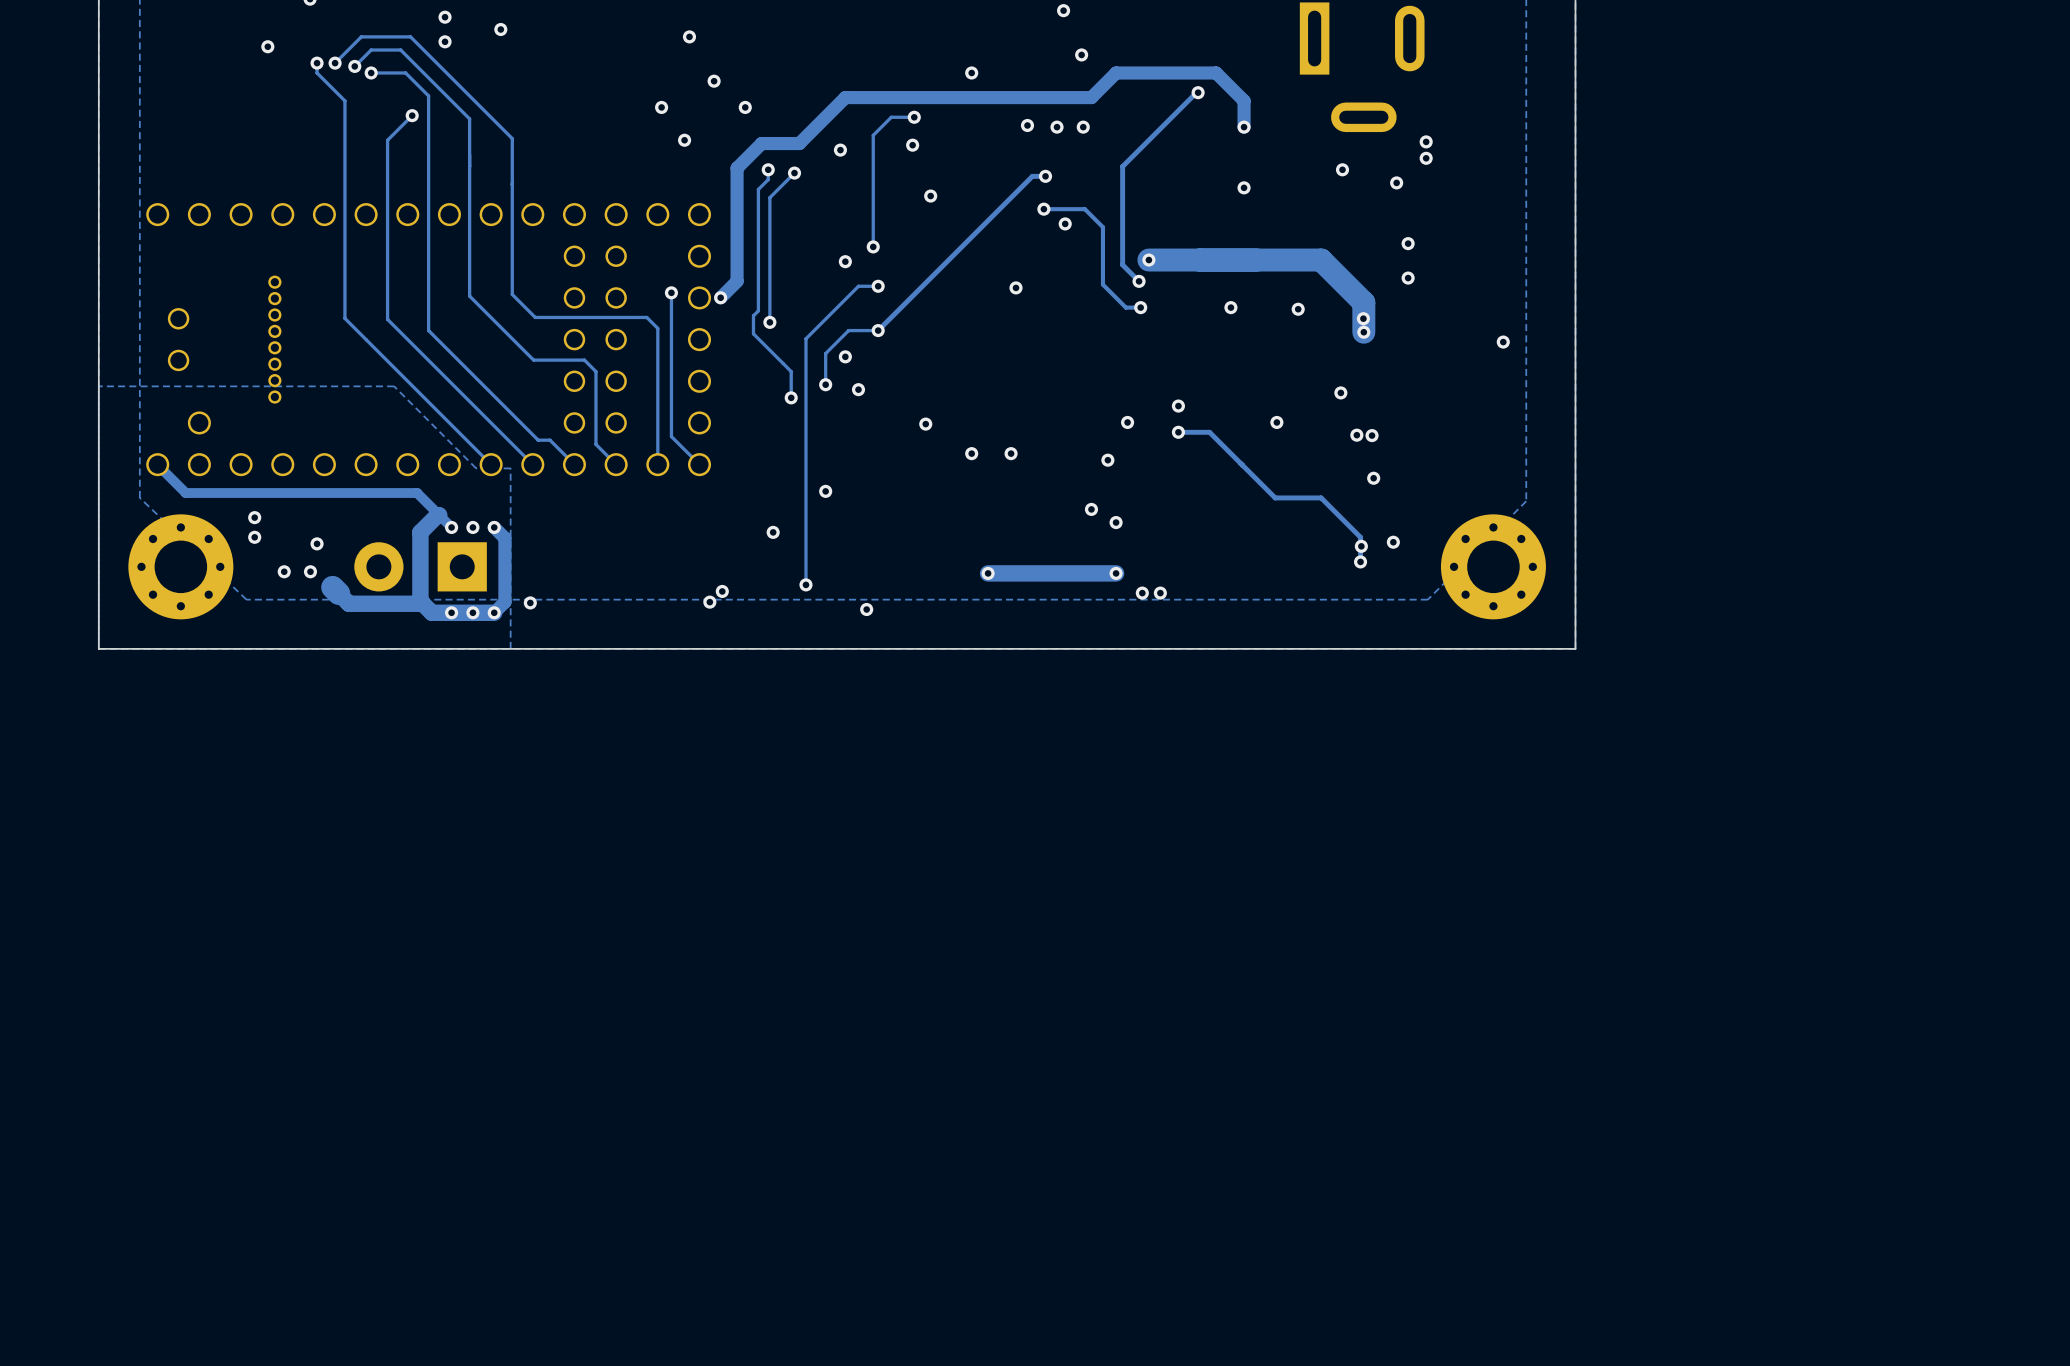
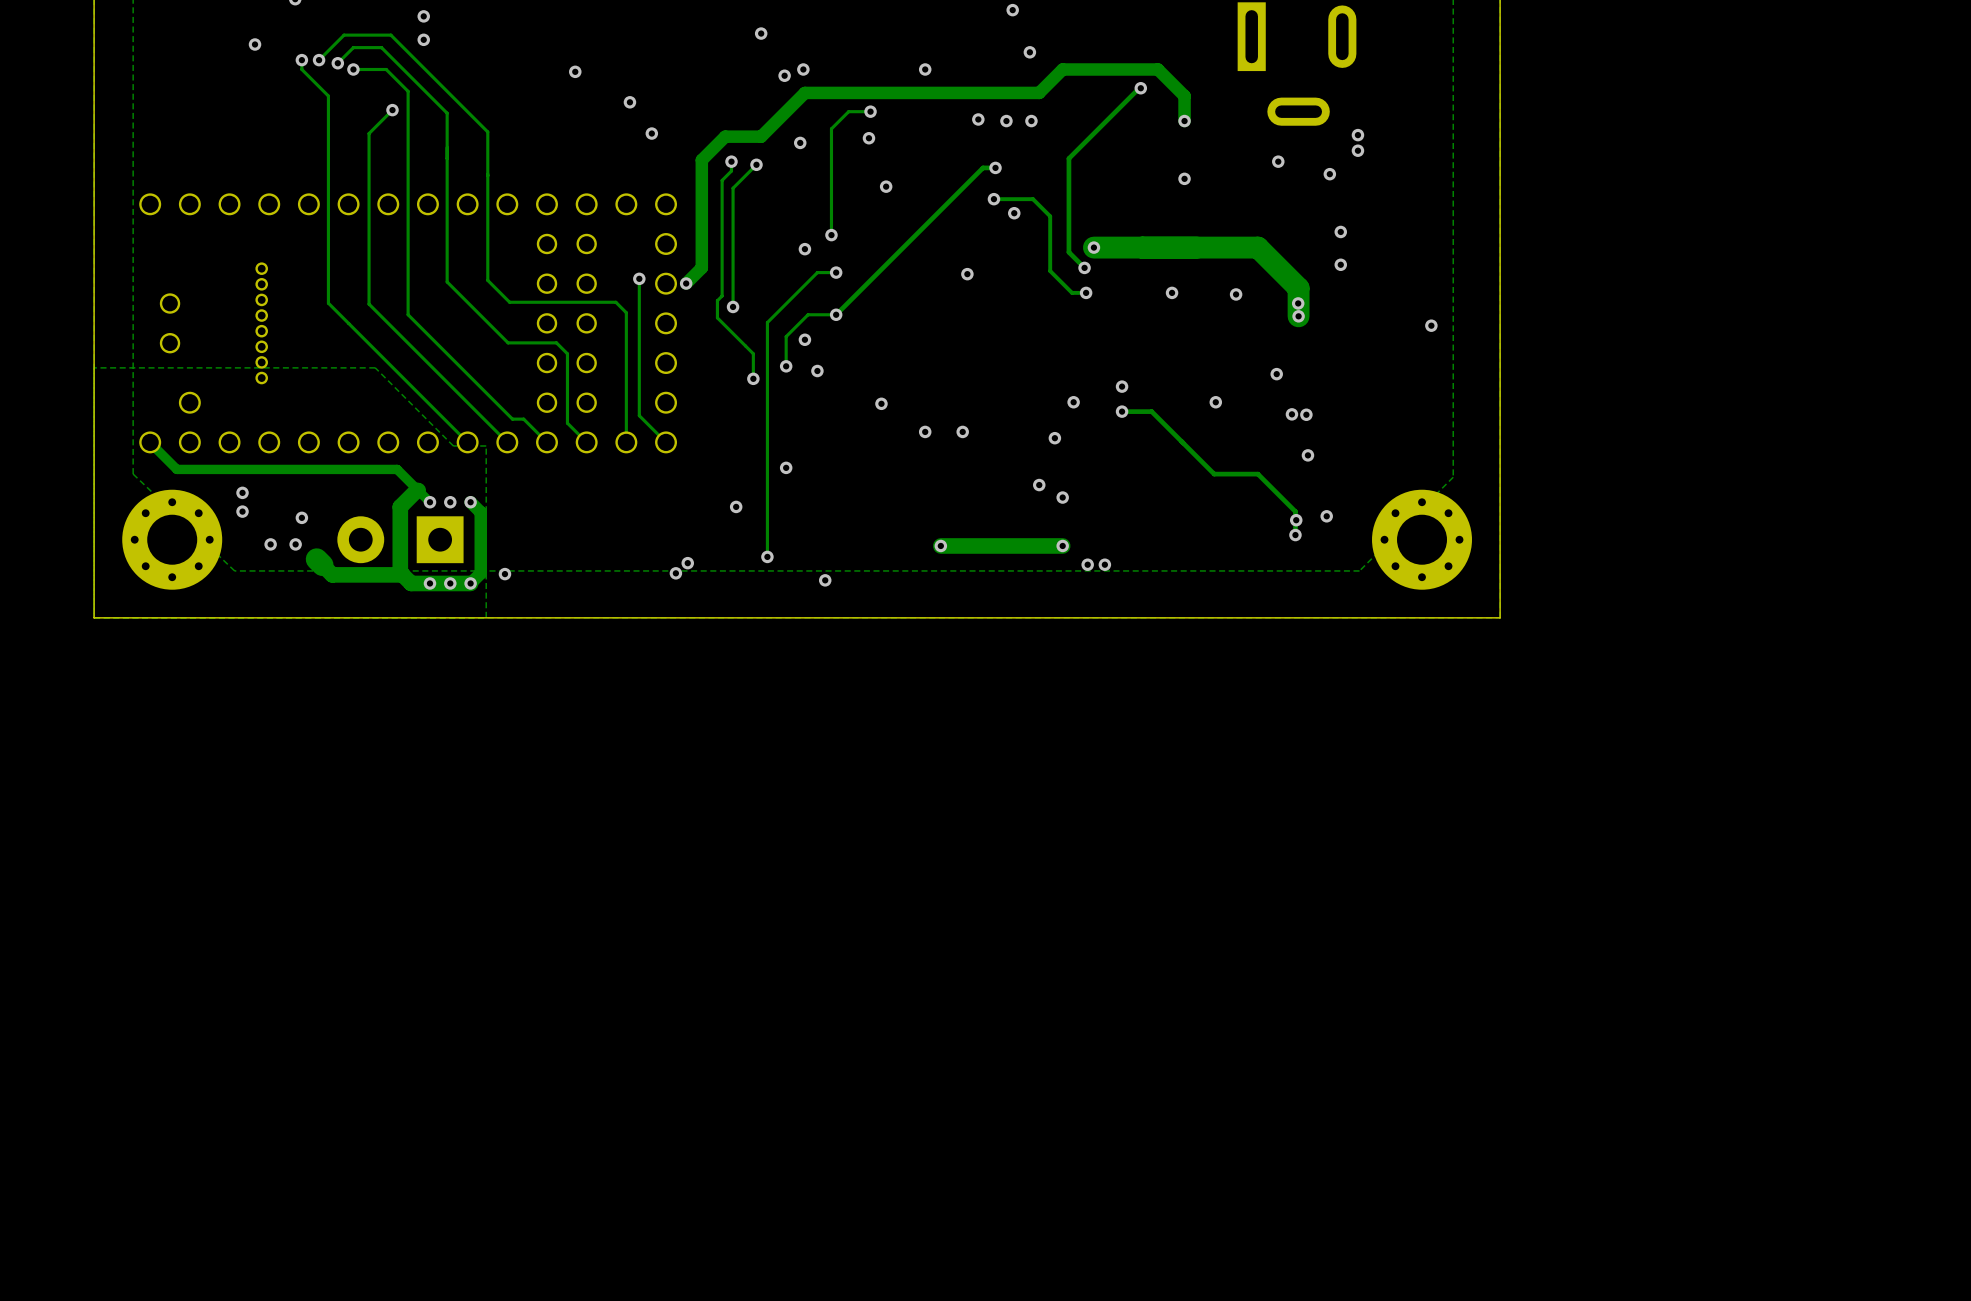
via: (500, 29) -> none
via: none -> (761, 33)
via: (689, 36) -> none
via: none -> (803, 69)
via: none -> (575, 71)
via: none -> (784, 75)
via: (714, 81) -> none
via: (745, 107) -> none

